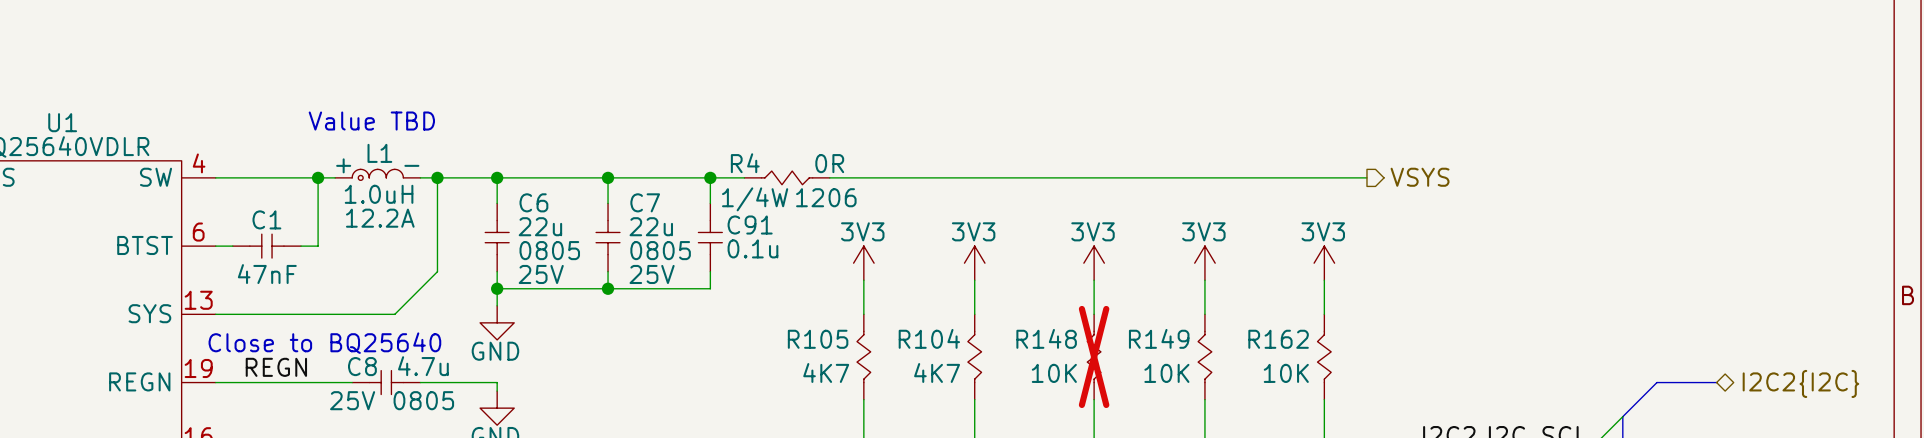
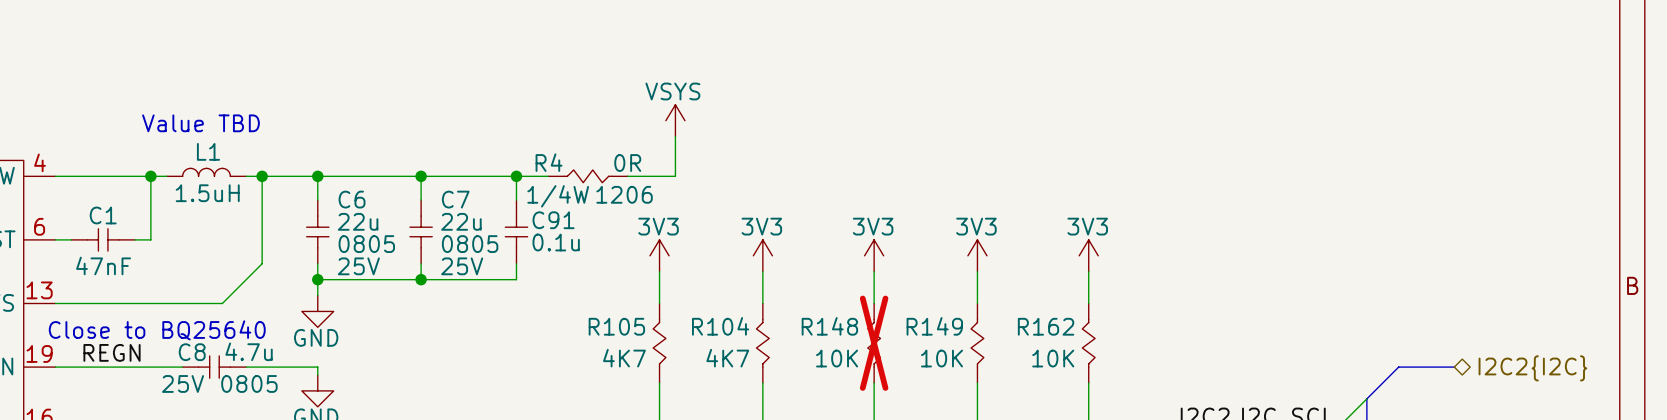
power symbol: none -> VSYS (675, 120)
L1 symbol: [335, 169, 421, 181] -> [166, 168, 247, 177]
wire: (880, 177) (1366, 177) -> (675, 176) (675, 136)
hierarchical label: VSYS (1420, 177) -> none
L1 text: 1.0uH (379, 194) -> 1.5uH (207, 193)
L1 text: 12.2A (380, 218) -> none

